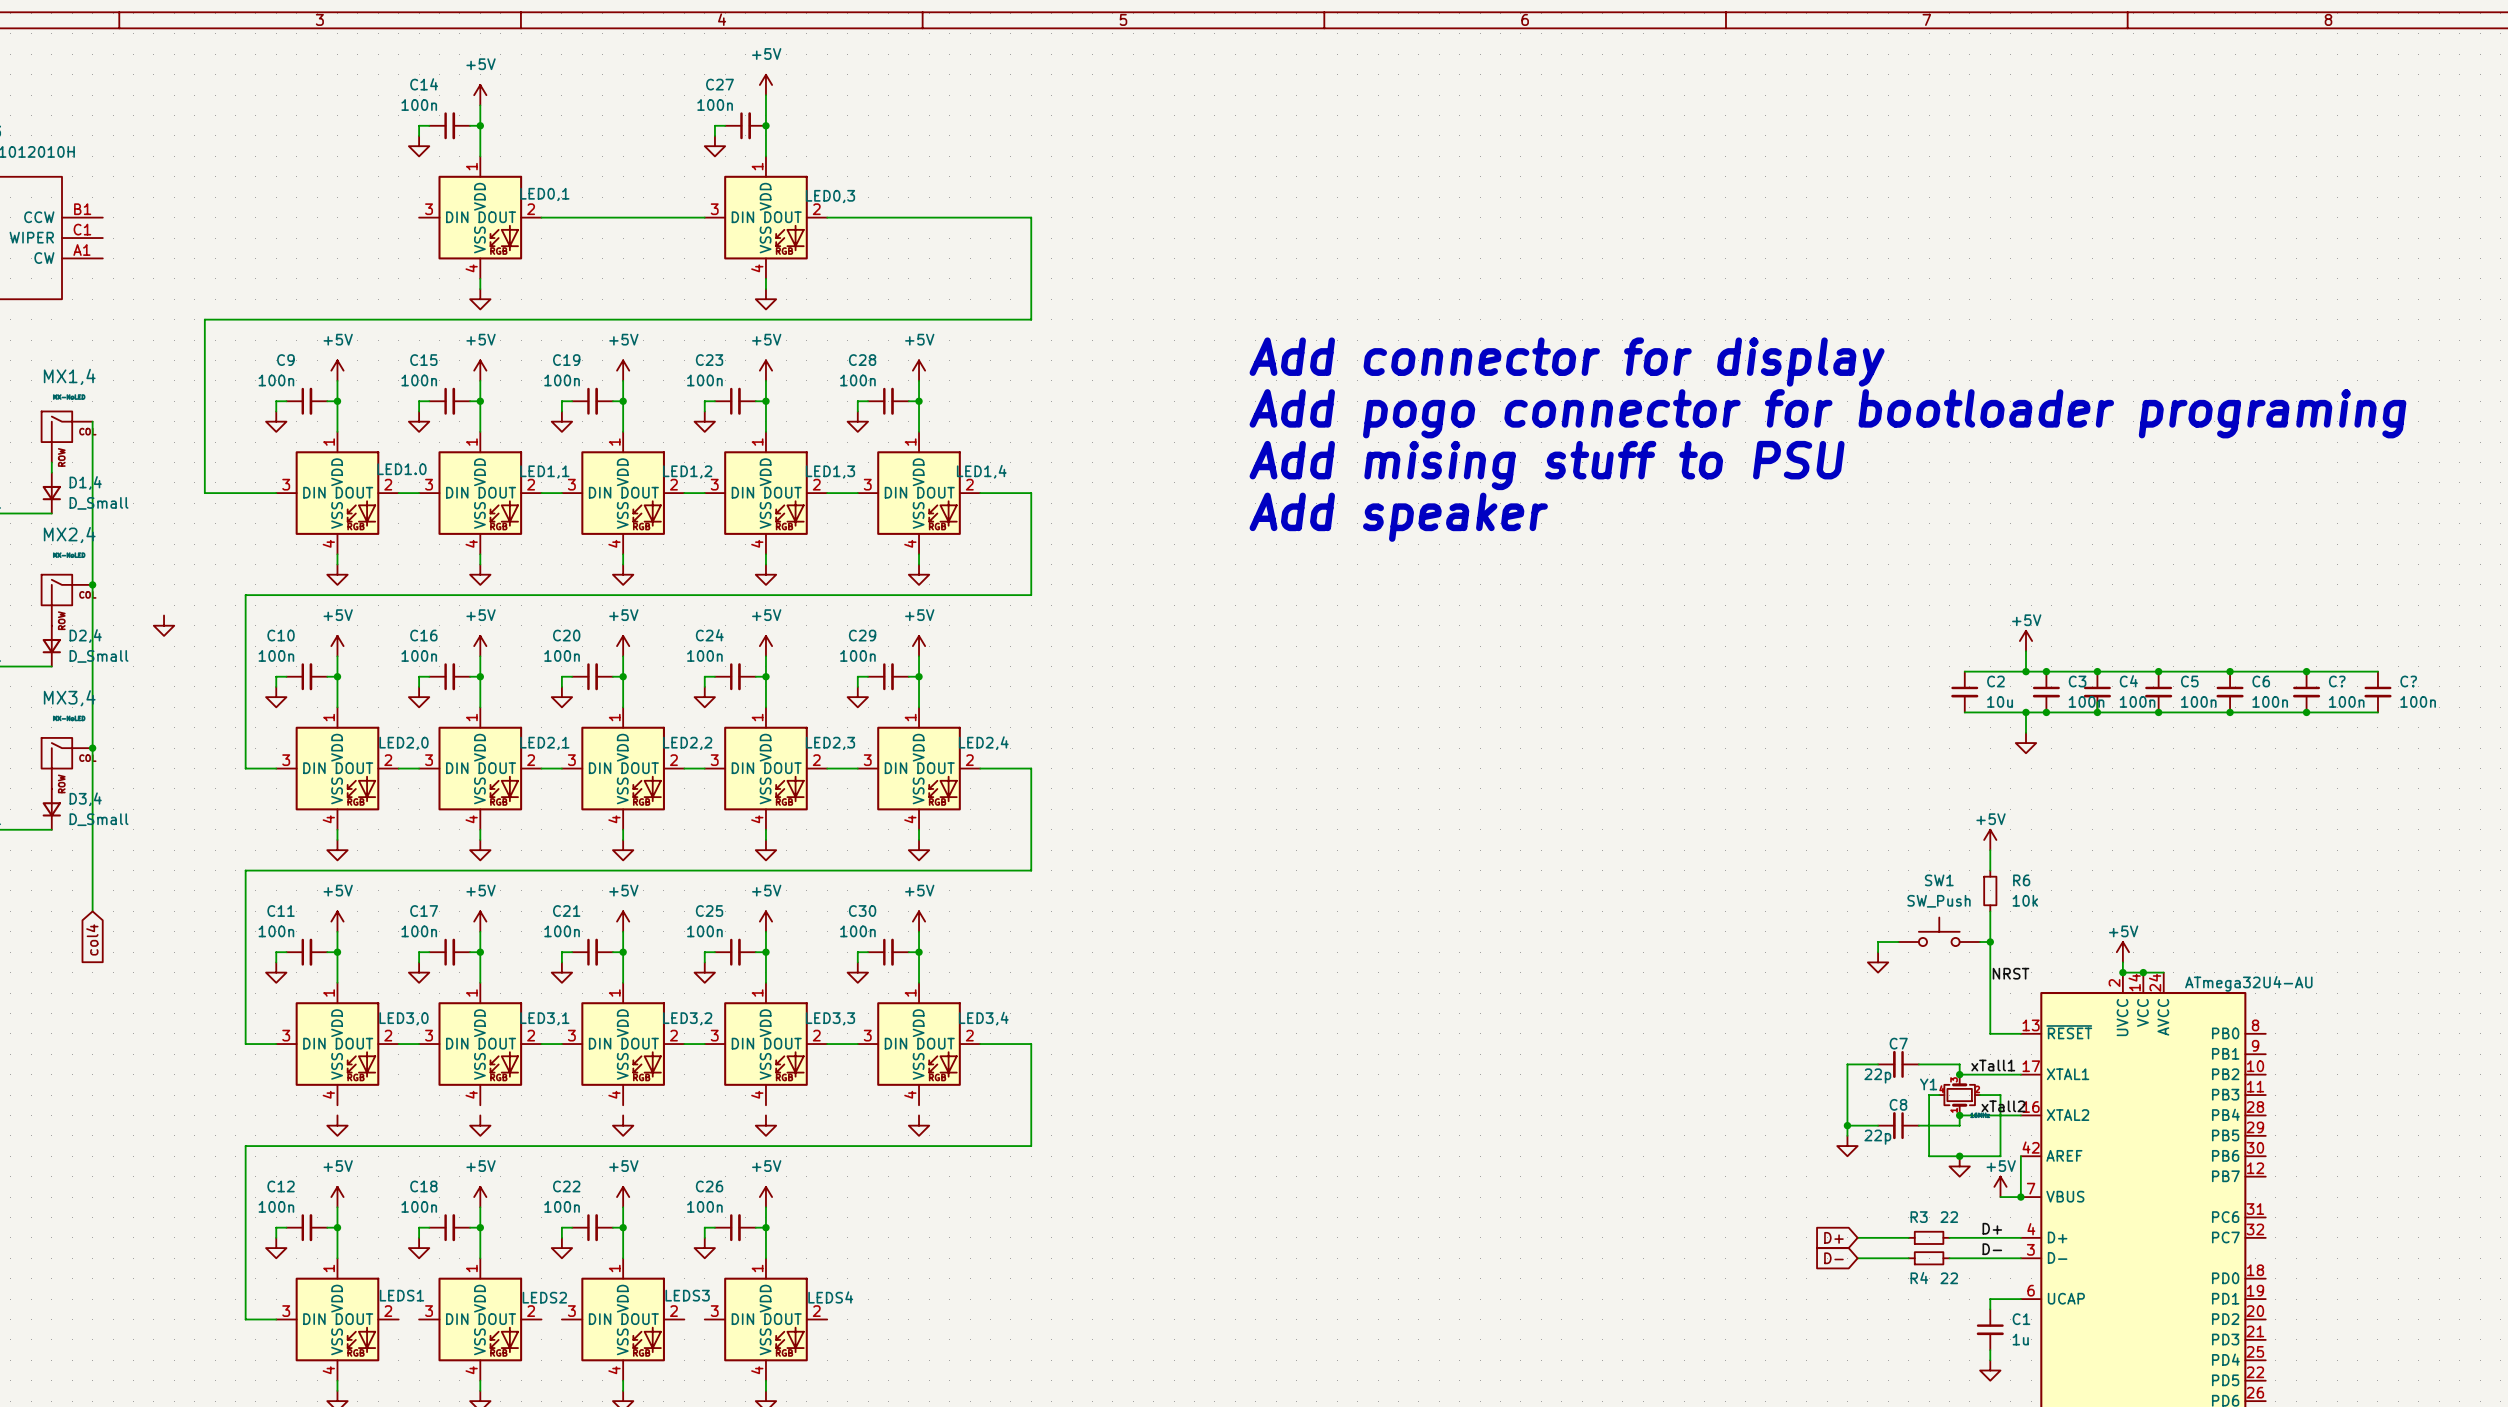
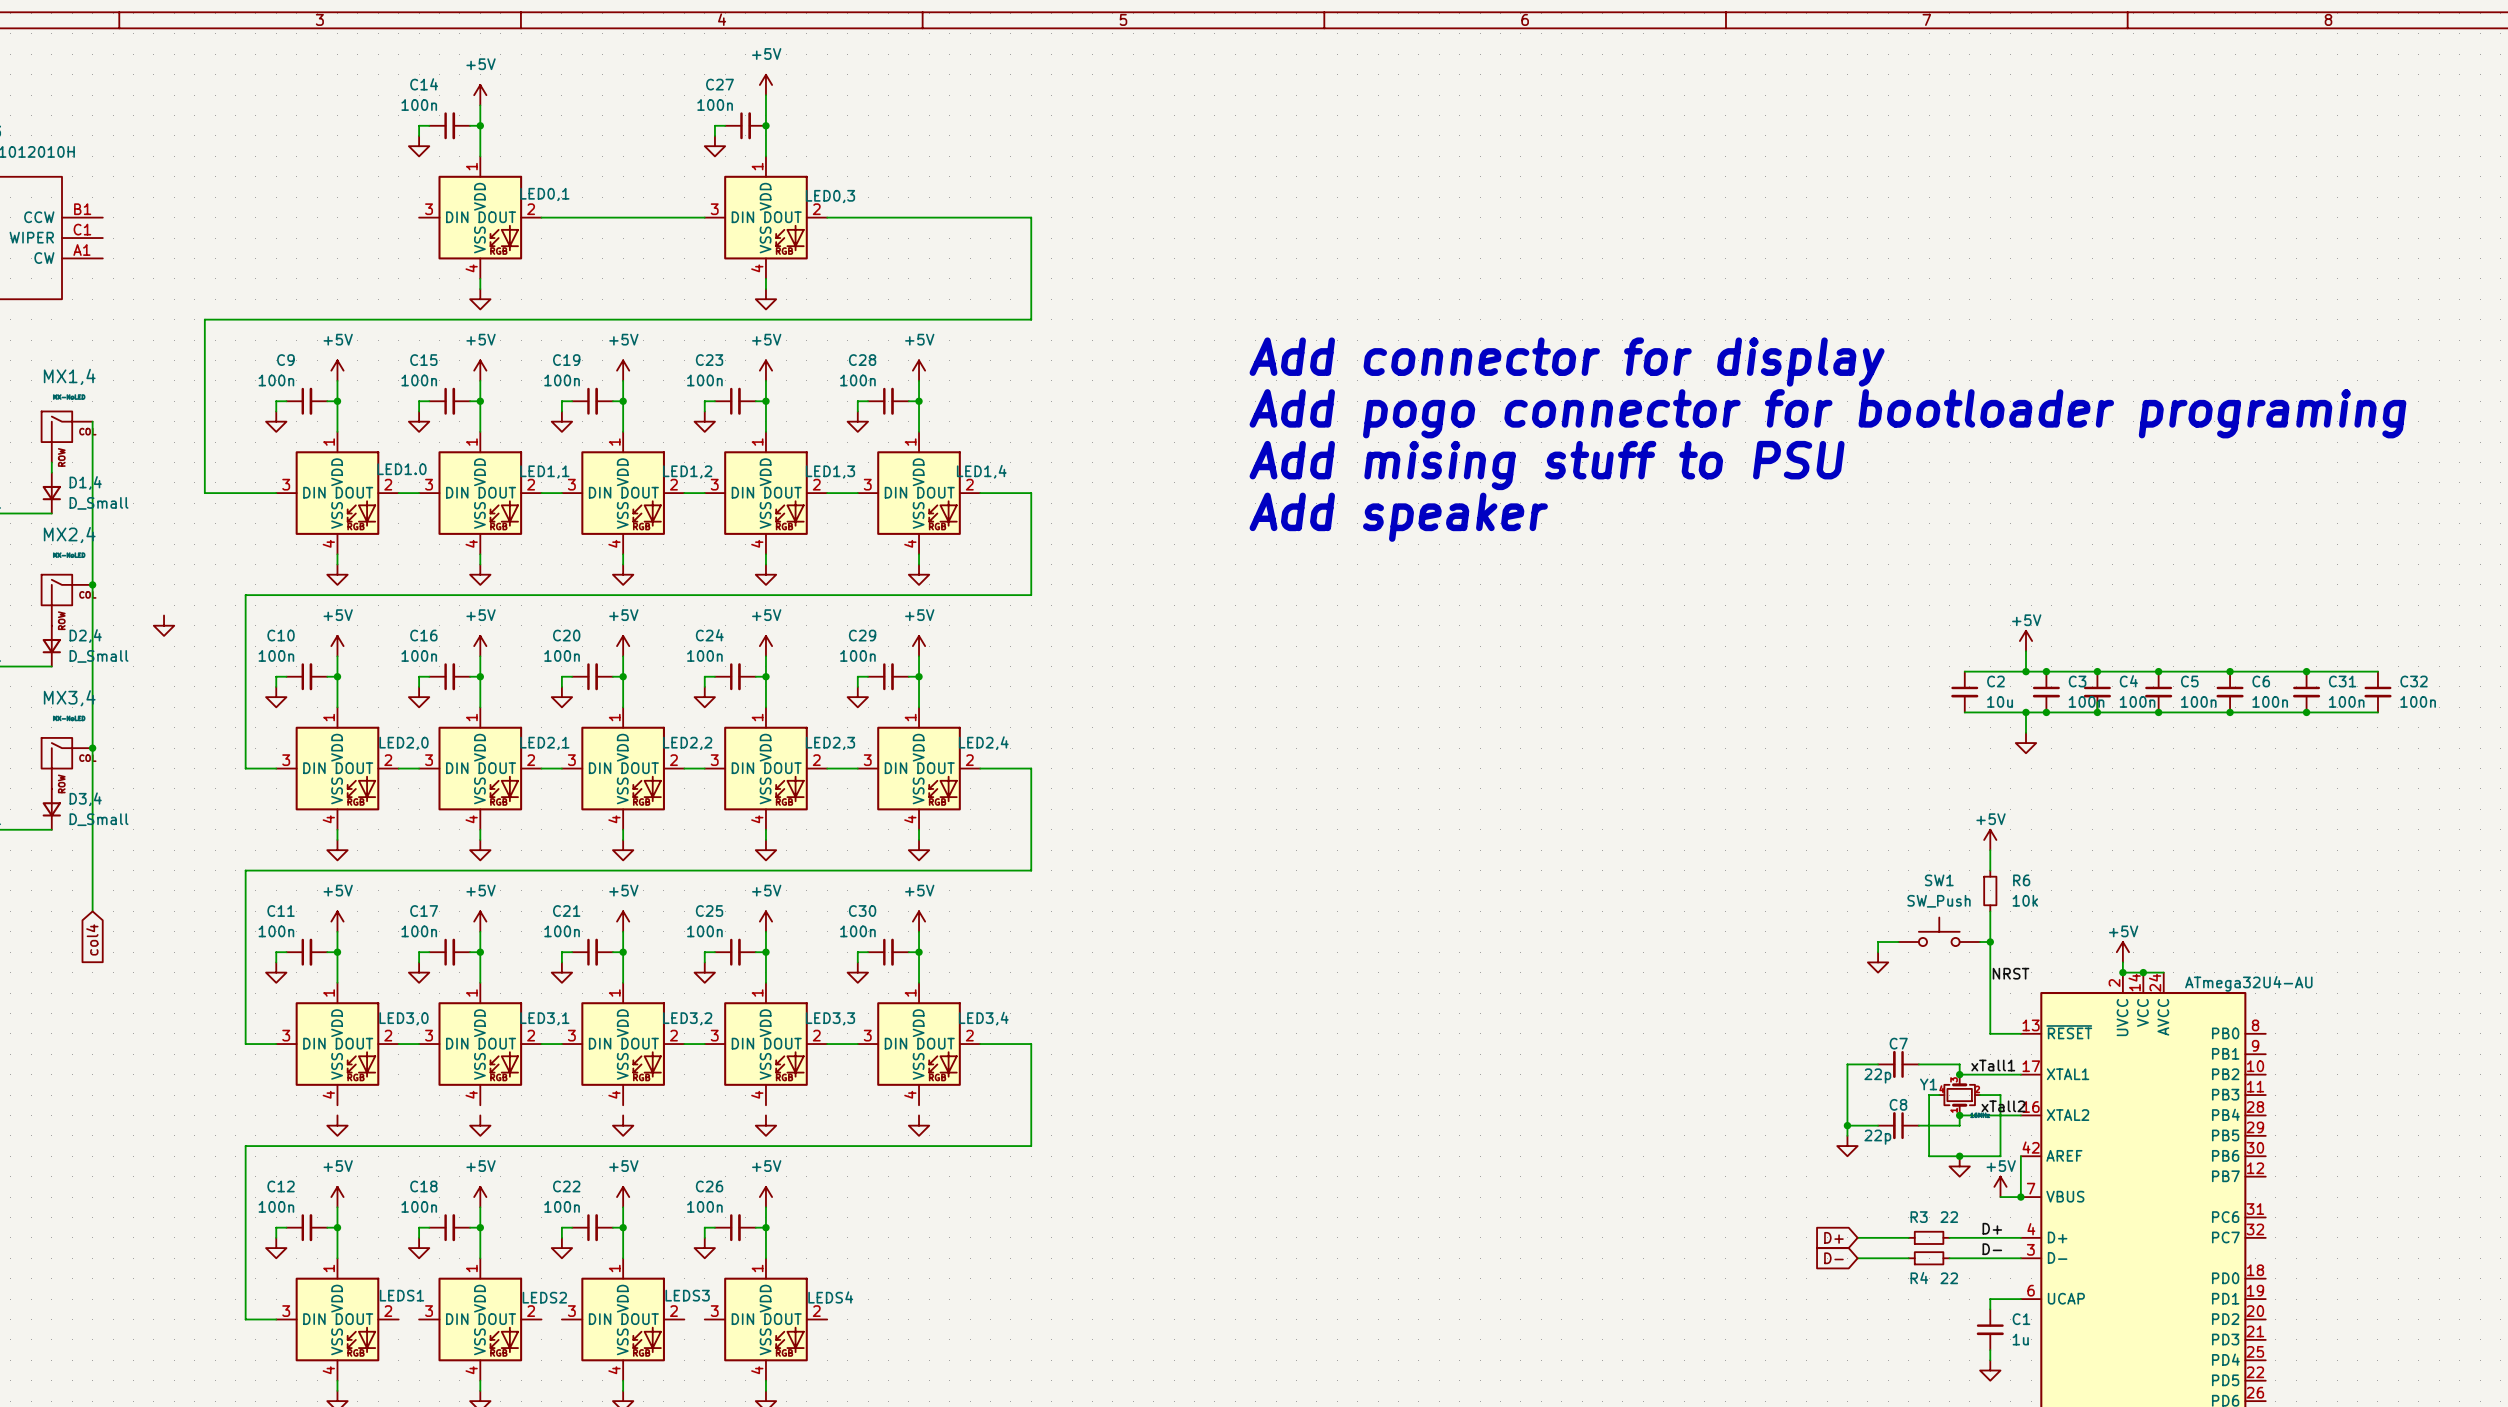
C? name: C? (2337, 681) -> C31 (2342, 681)
C? name: C? (2408, 681) -> C32 (2414, 681)

